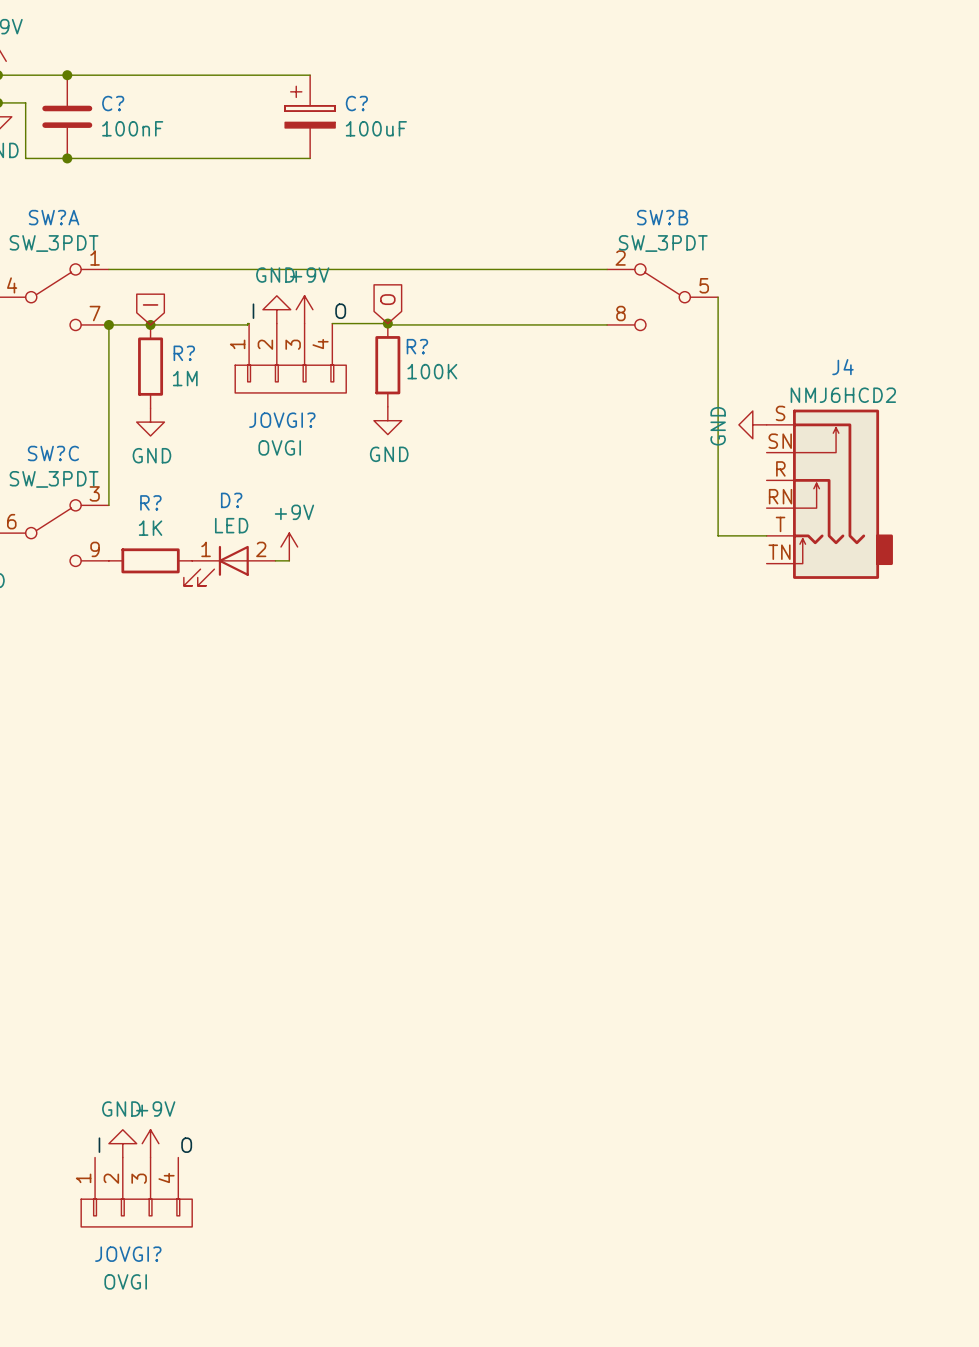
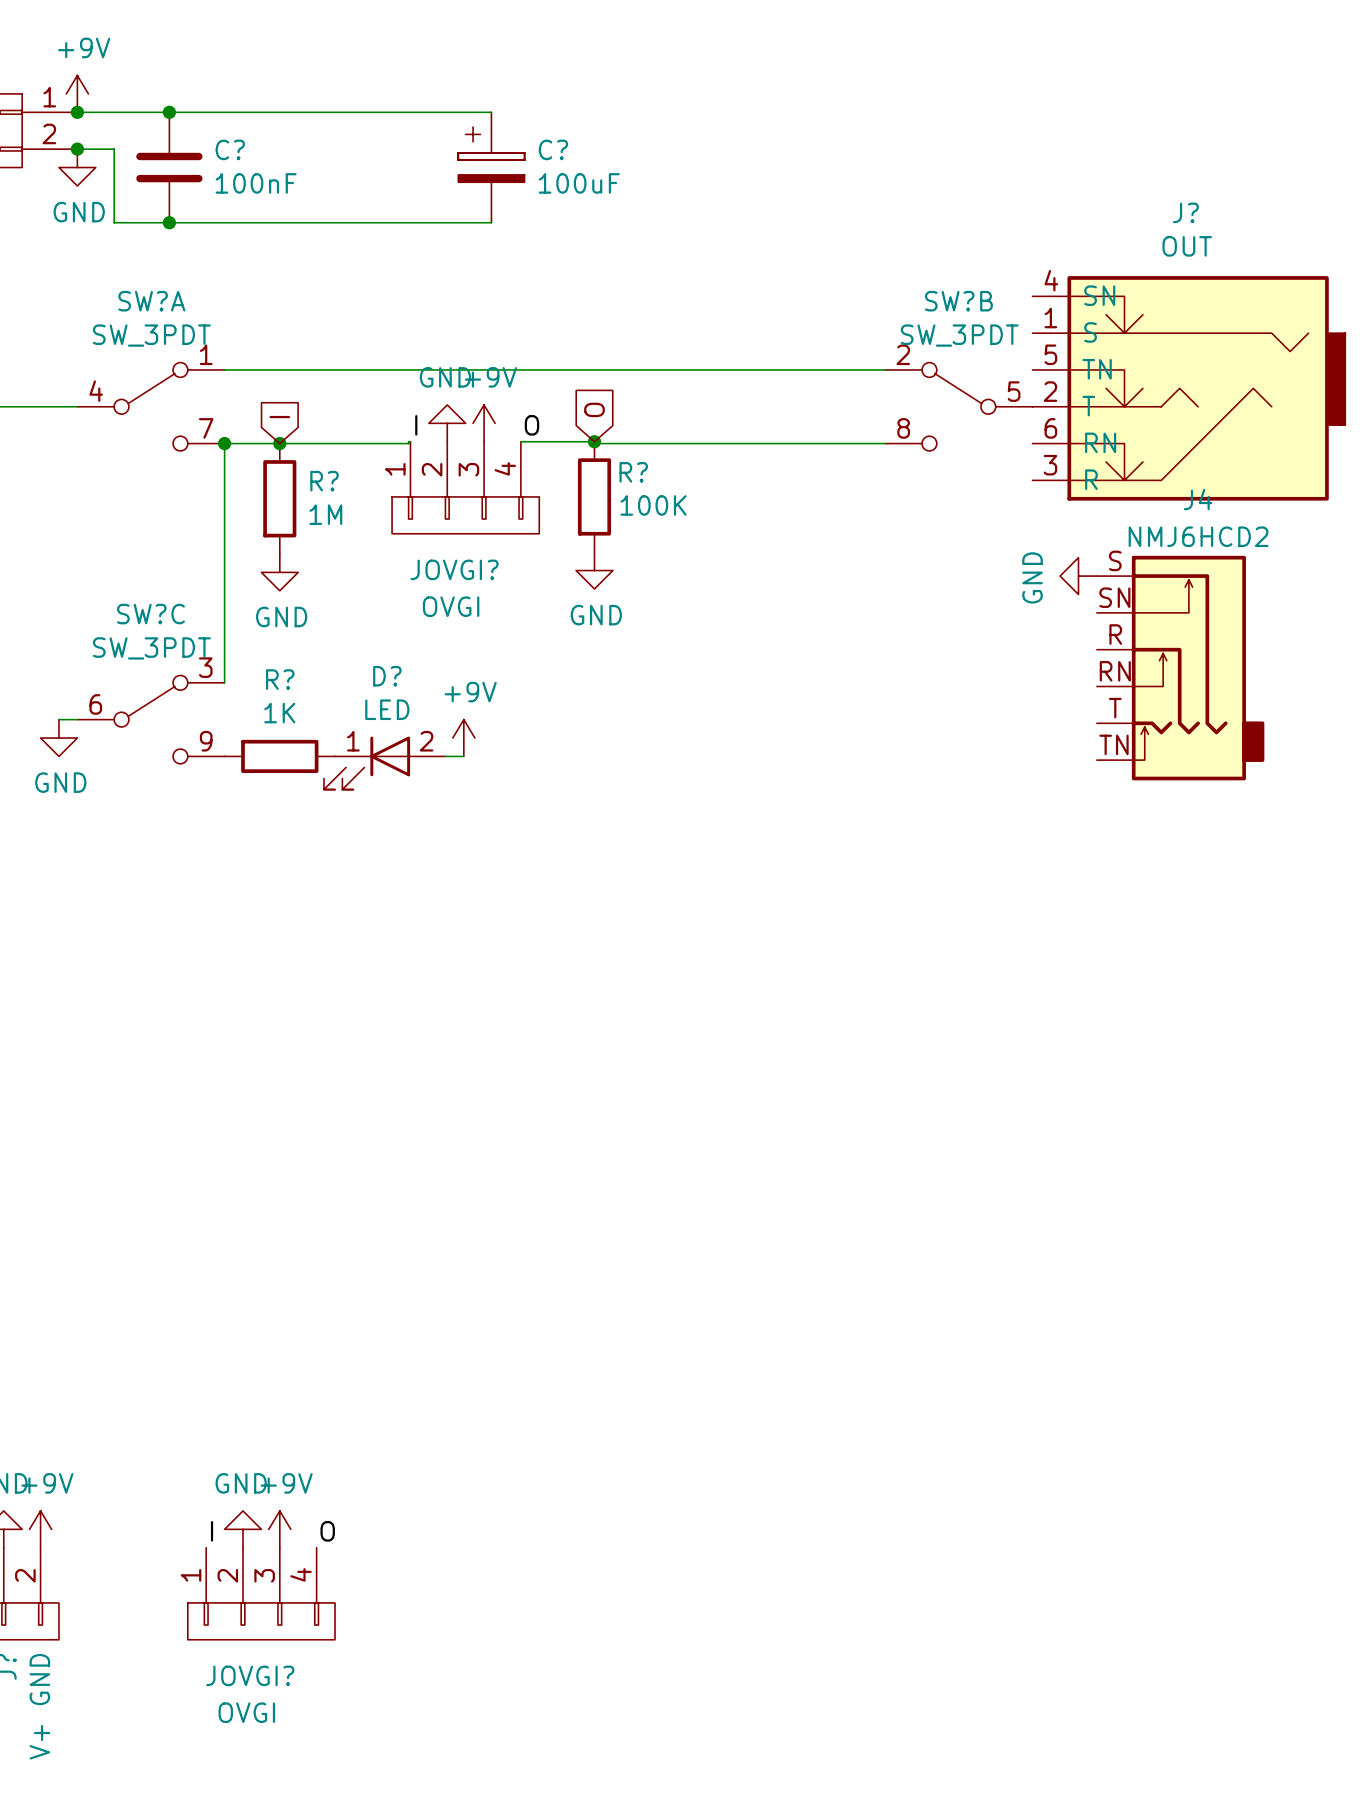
J?: none -> OUT (1188, 388)
wire: (718, 297) (718, 535) (766, 535) -> none

